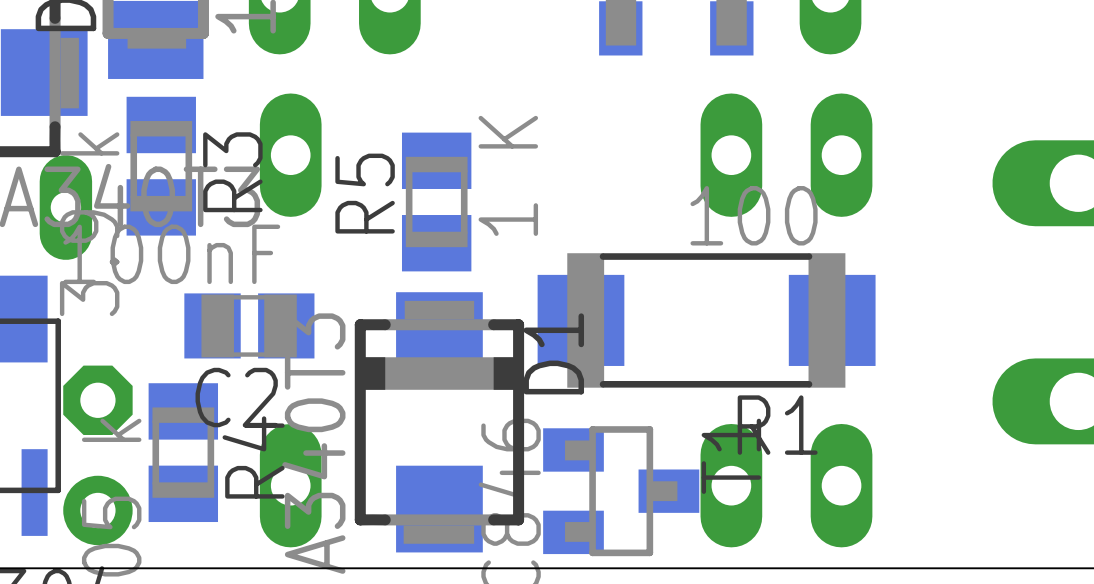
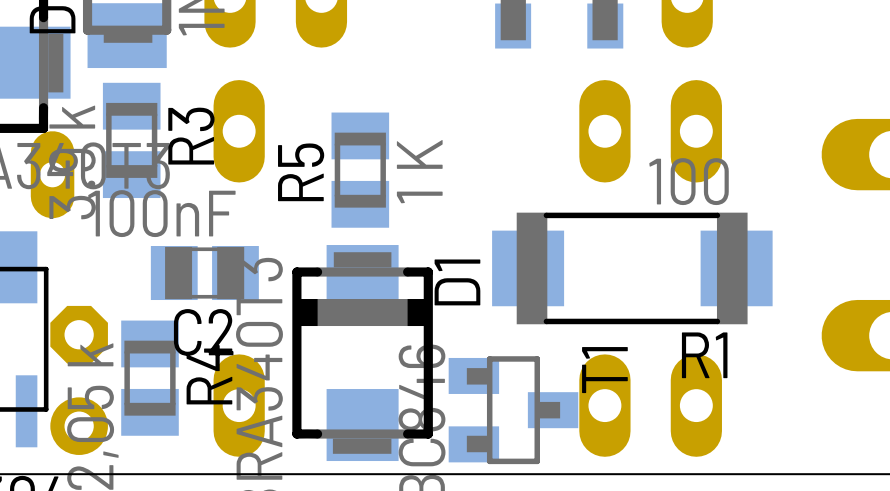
R1 position: (706, 320) -> (632, 268)

